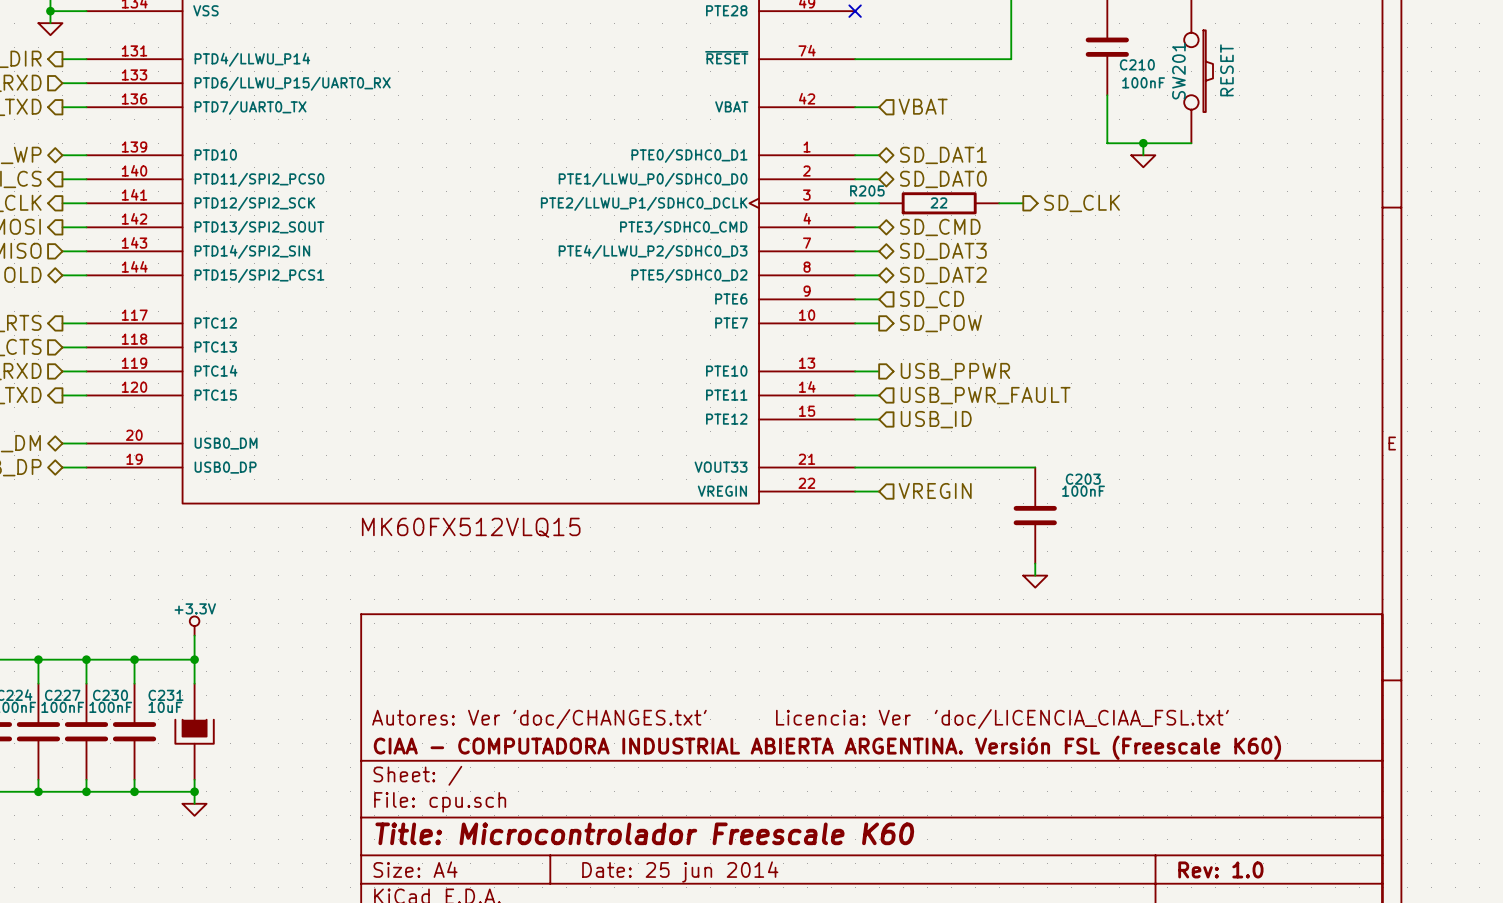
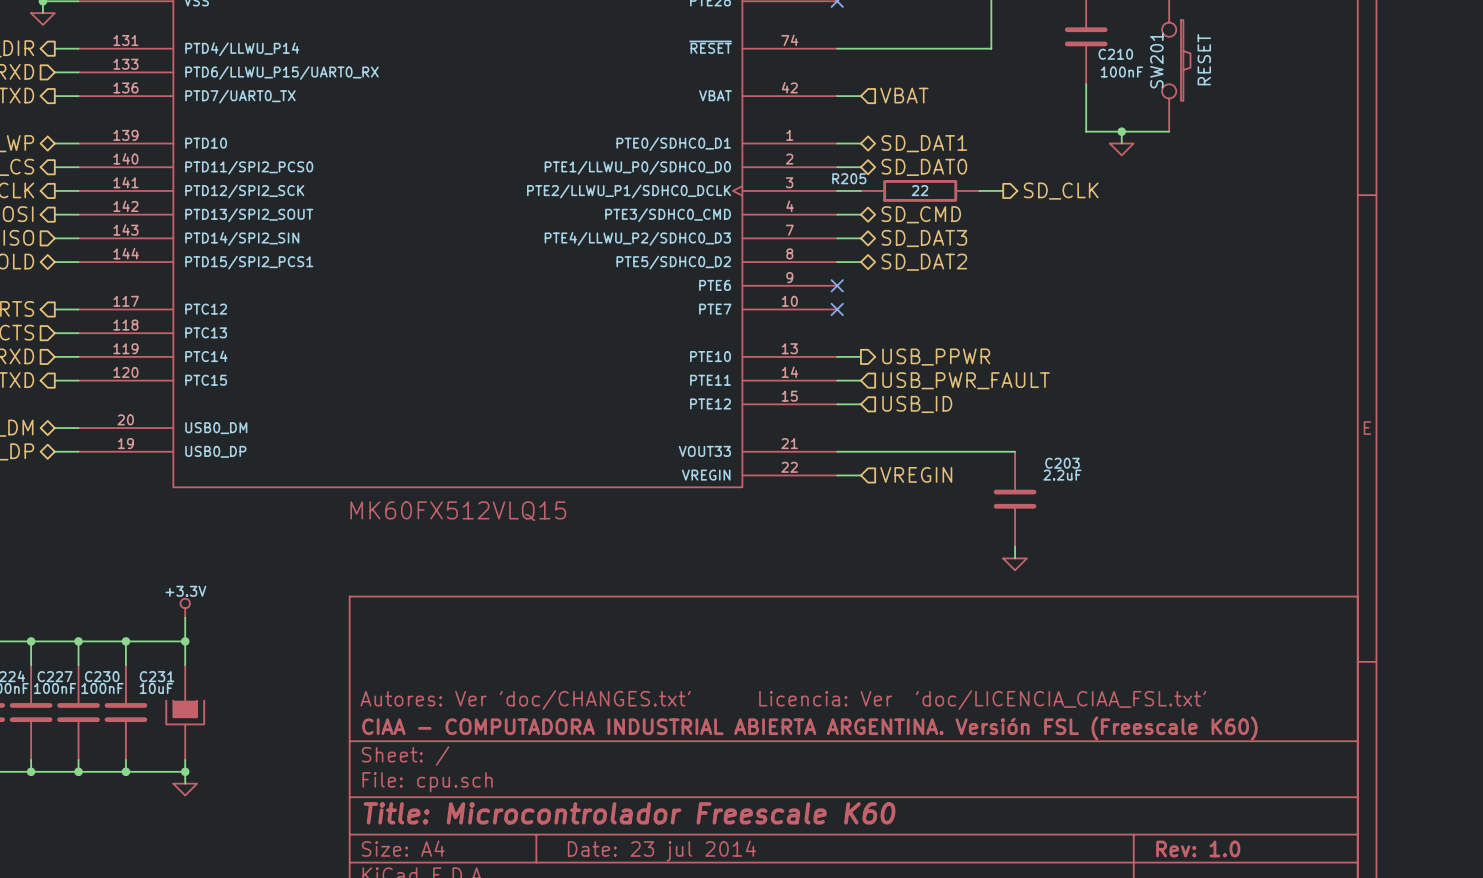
wire: (855, 299) (879, 299) -> none
no-connect mark: none -> (837, 285)
hierarchical label: SD_CD (932, 299) -> none
wire: (855, 323) (879, 323) -> none
no-connect mark: none -> (837, 309)
hierarchical label: SD_POW (940, 323) -> none
C203 value: 100nF (1083, 491) -> 2.2uF (1062, 475)
title block: Date: 25 jun 2014 (680, 871) -> Date: 23 jul 2014 (661, 850)

